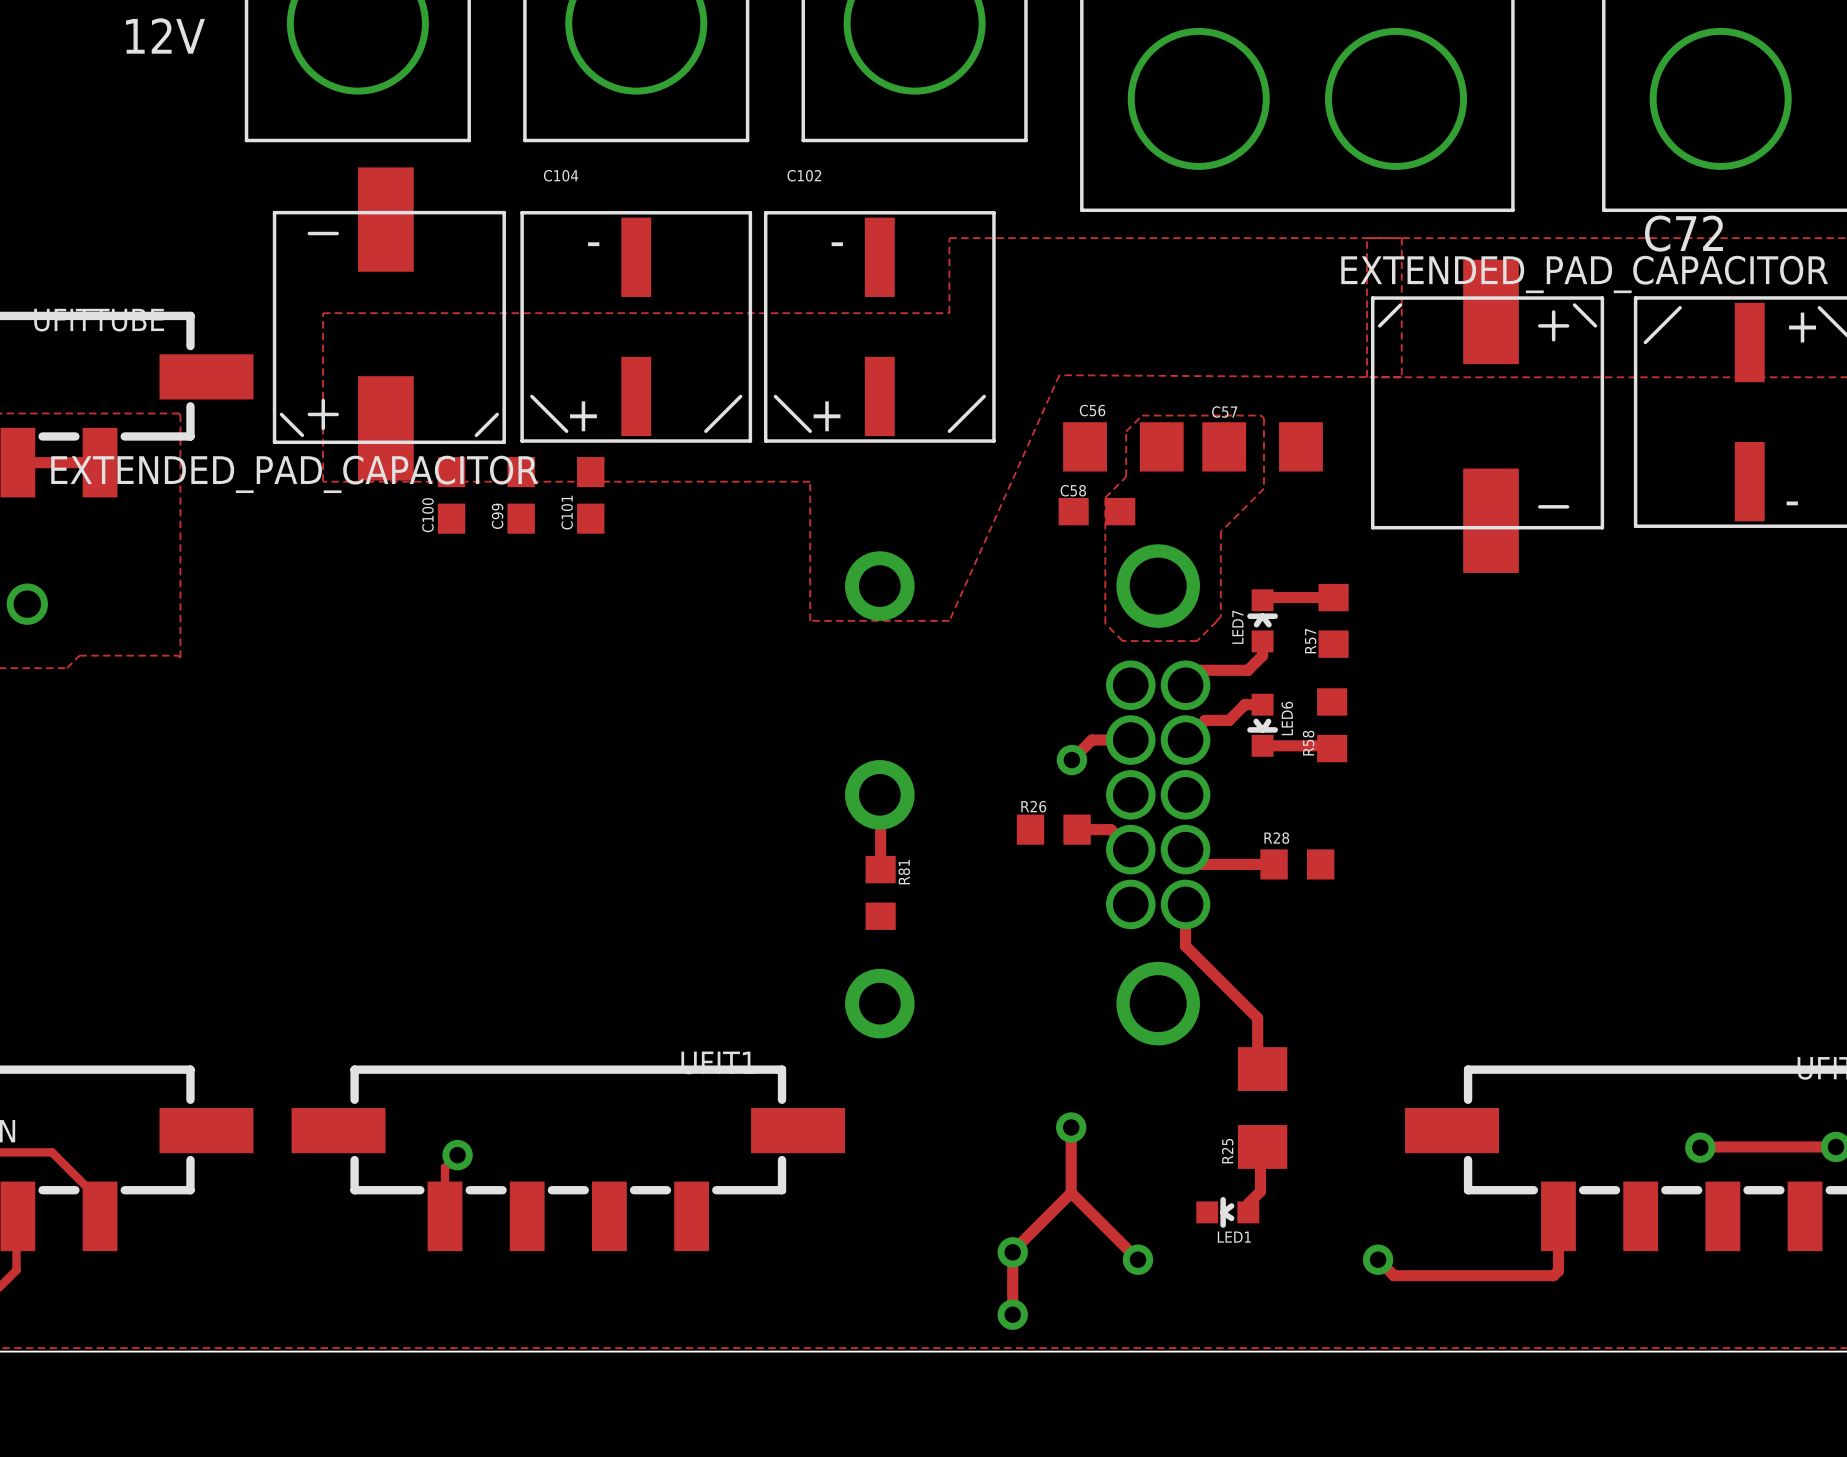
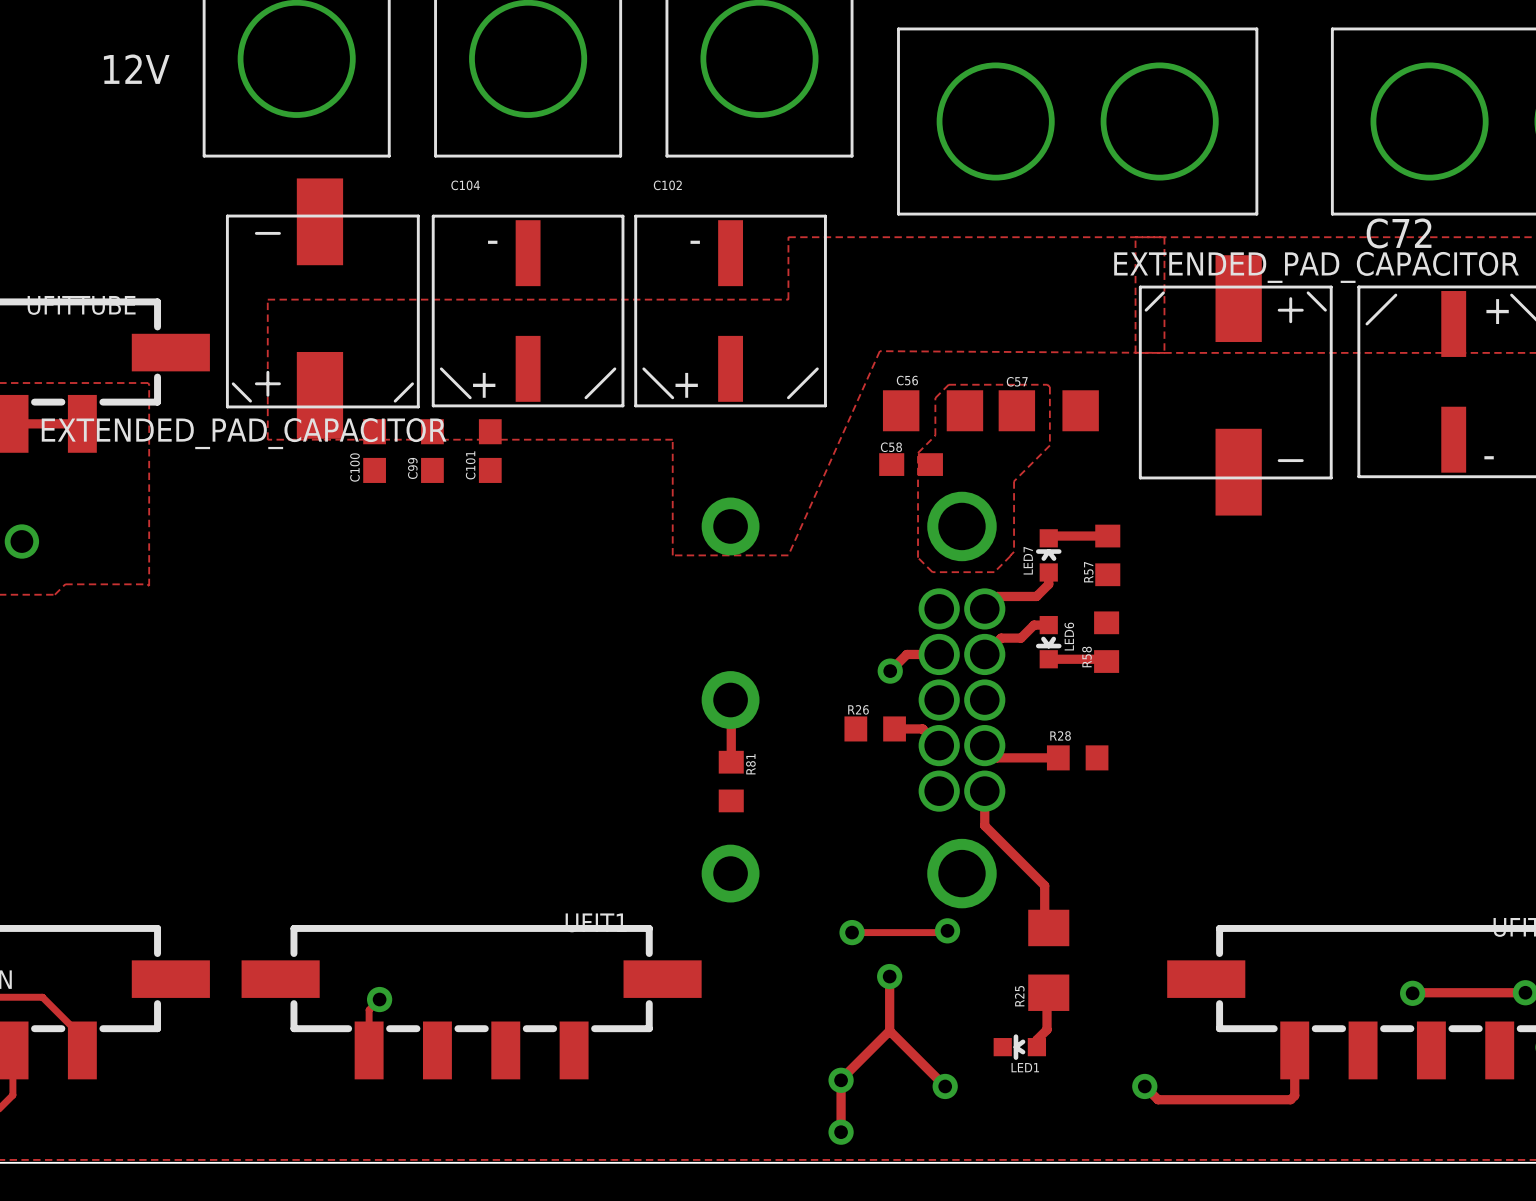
track: none -> (947, 930) (945, 932) (852, 932)
via: none -> (947, 930)
via: none -> (852, 932)

